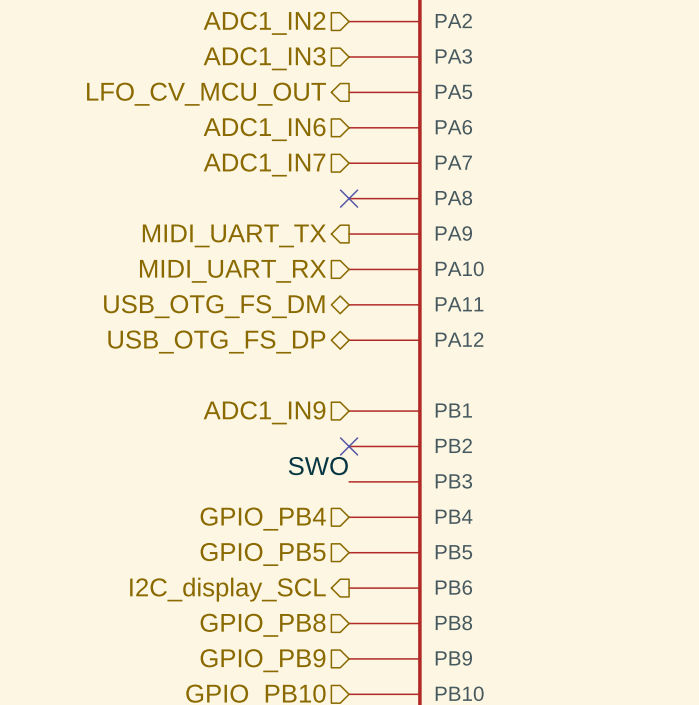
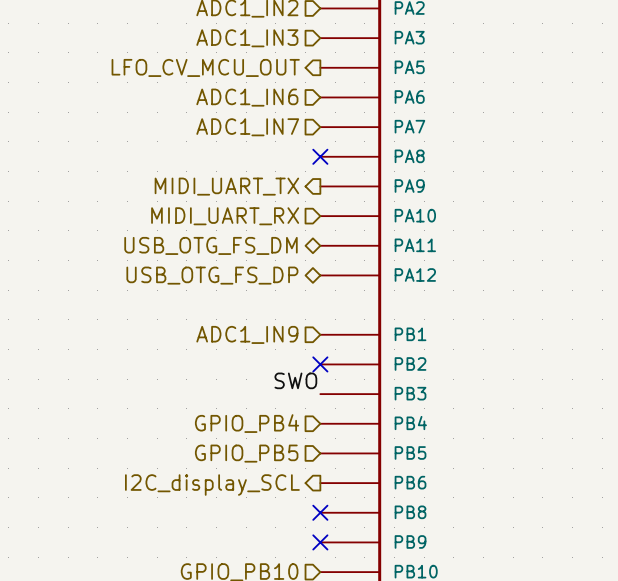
no-connect mark: none -> (320, 512)
hierarchical label: GPIO_PB8 (263, 625) -> none
no-connect mark: none -> (320, 542)
hierarchical label: GPIO_PB9 (262, 660) -> none

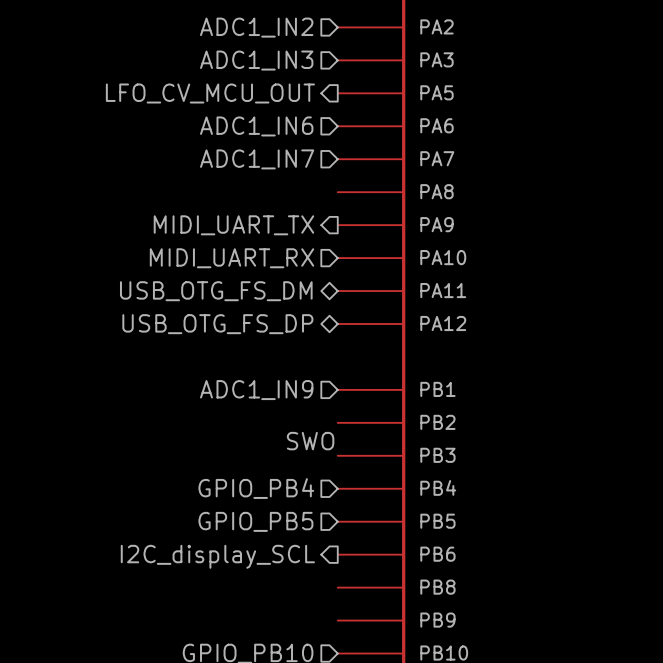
no-connect mark: (320, 156) -> none
no-connect mark: (320, 364) -> none
no-connect mark: (320, 512) -> none
no-connect mark: (320, 542) -> none

